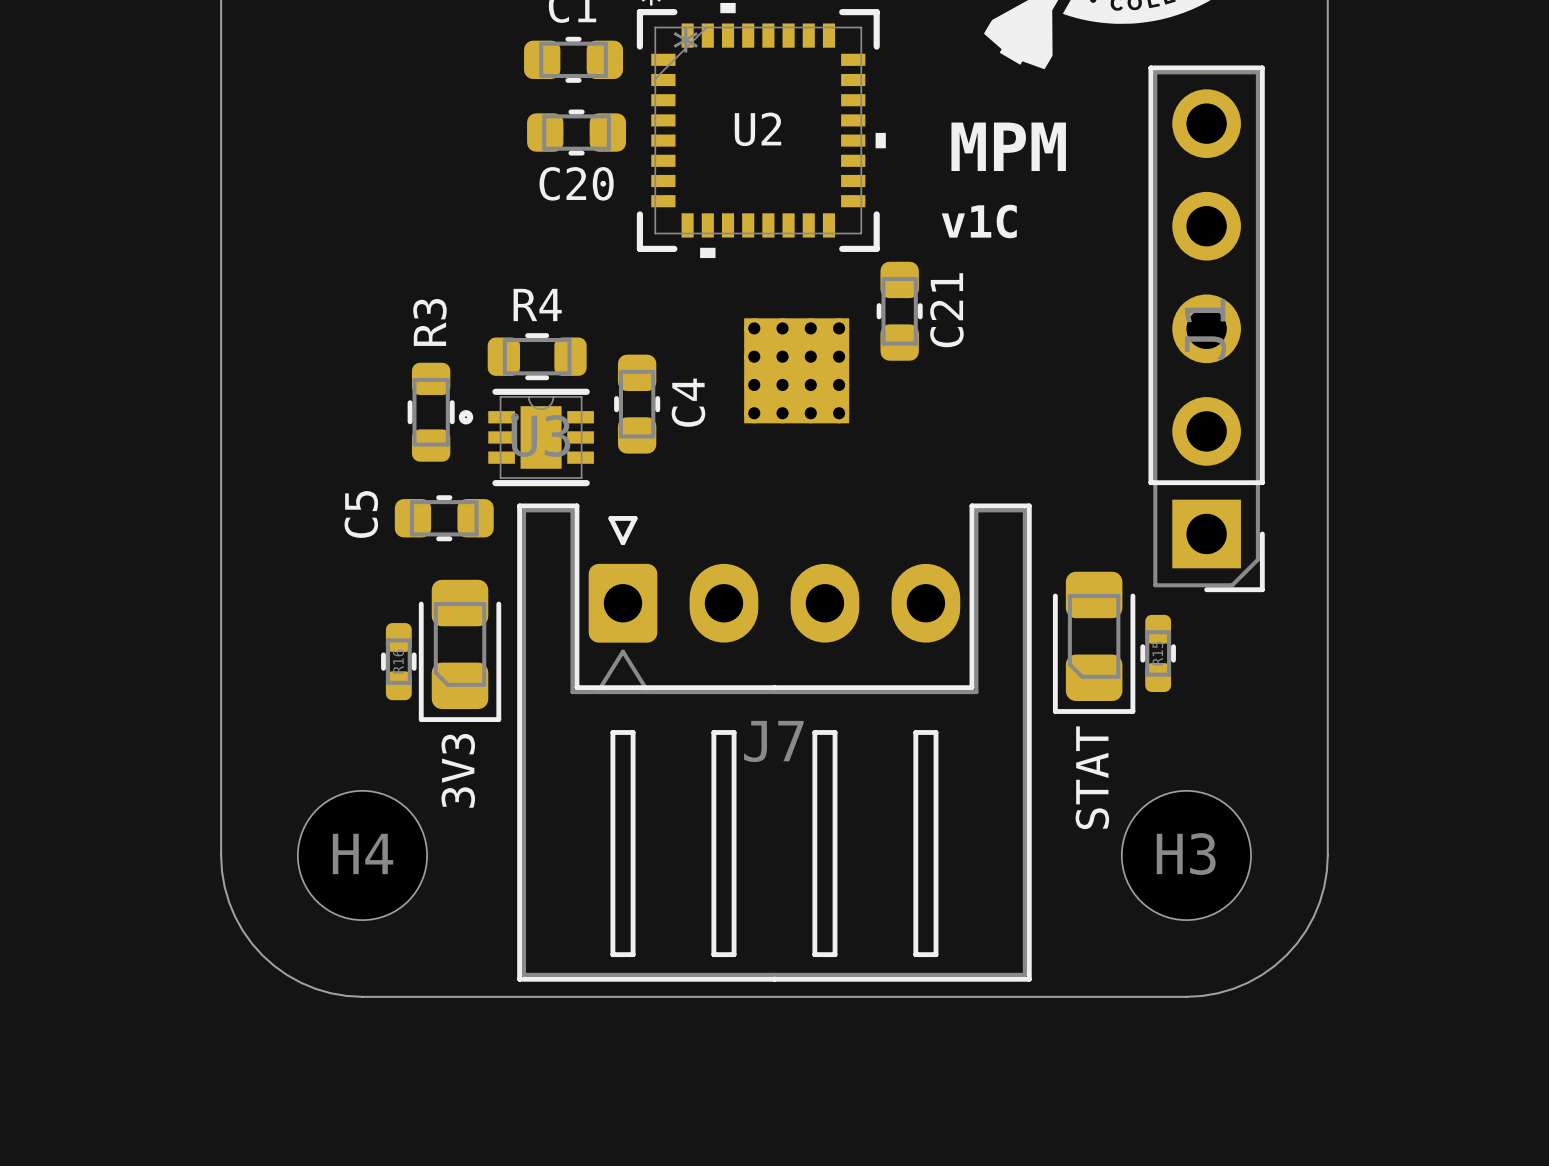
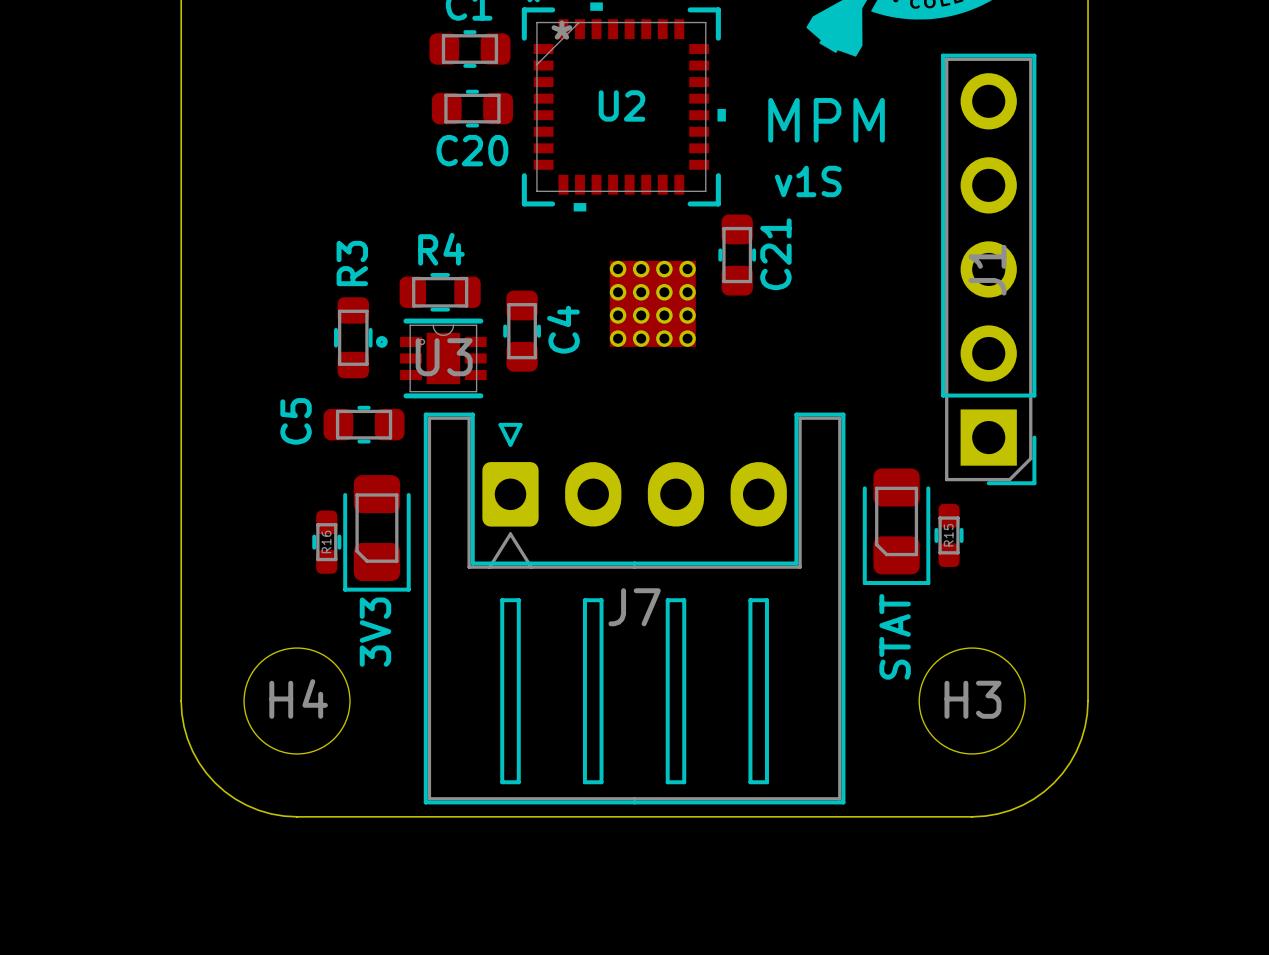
text: v1C (979, 221) -> v1S (808, 181)

